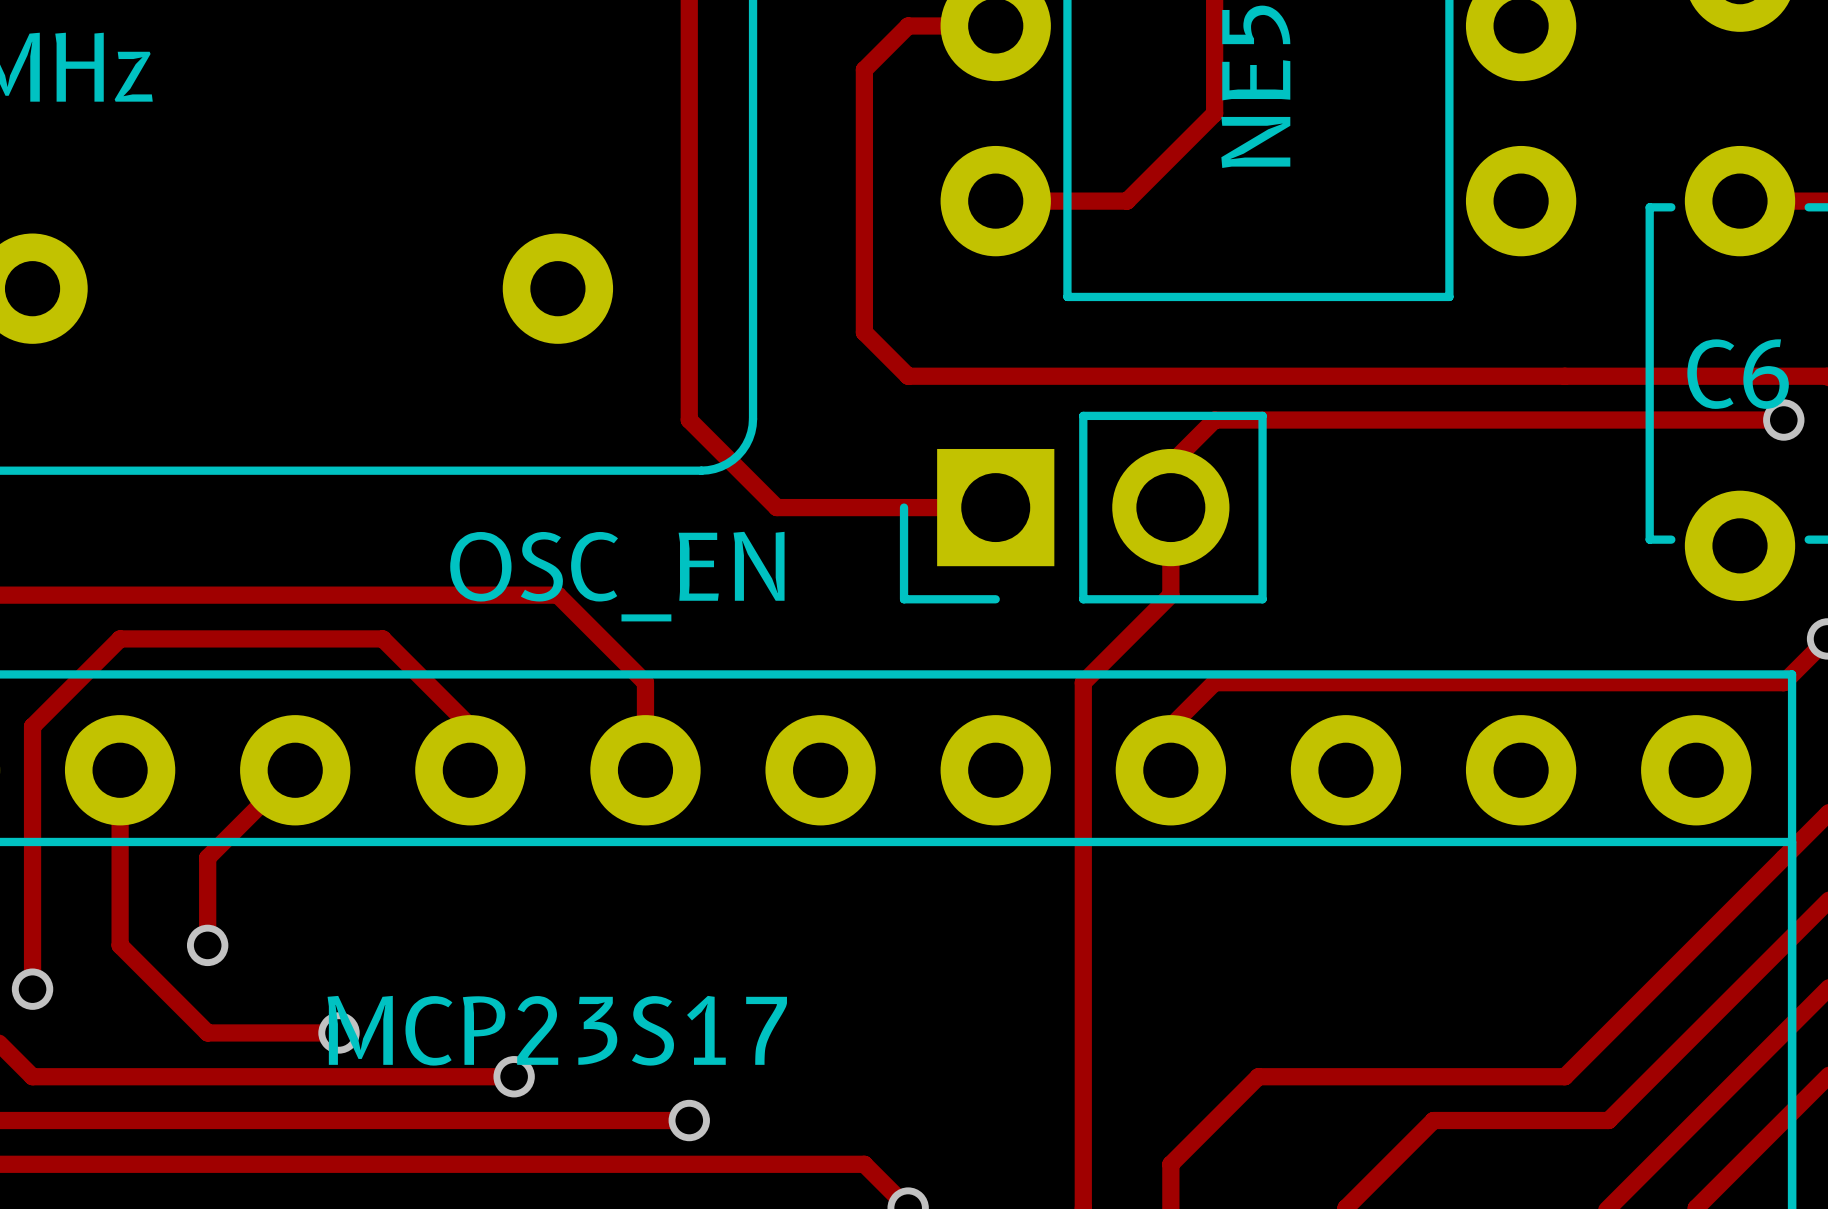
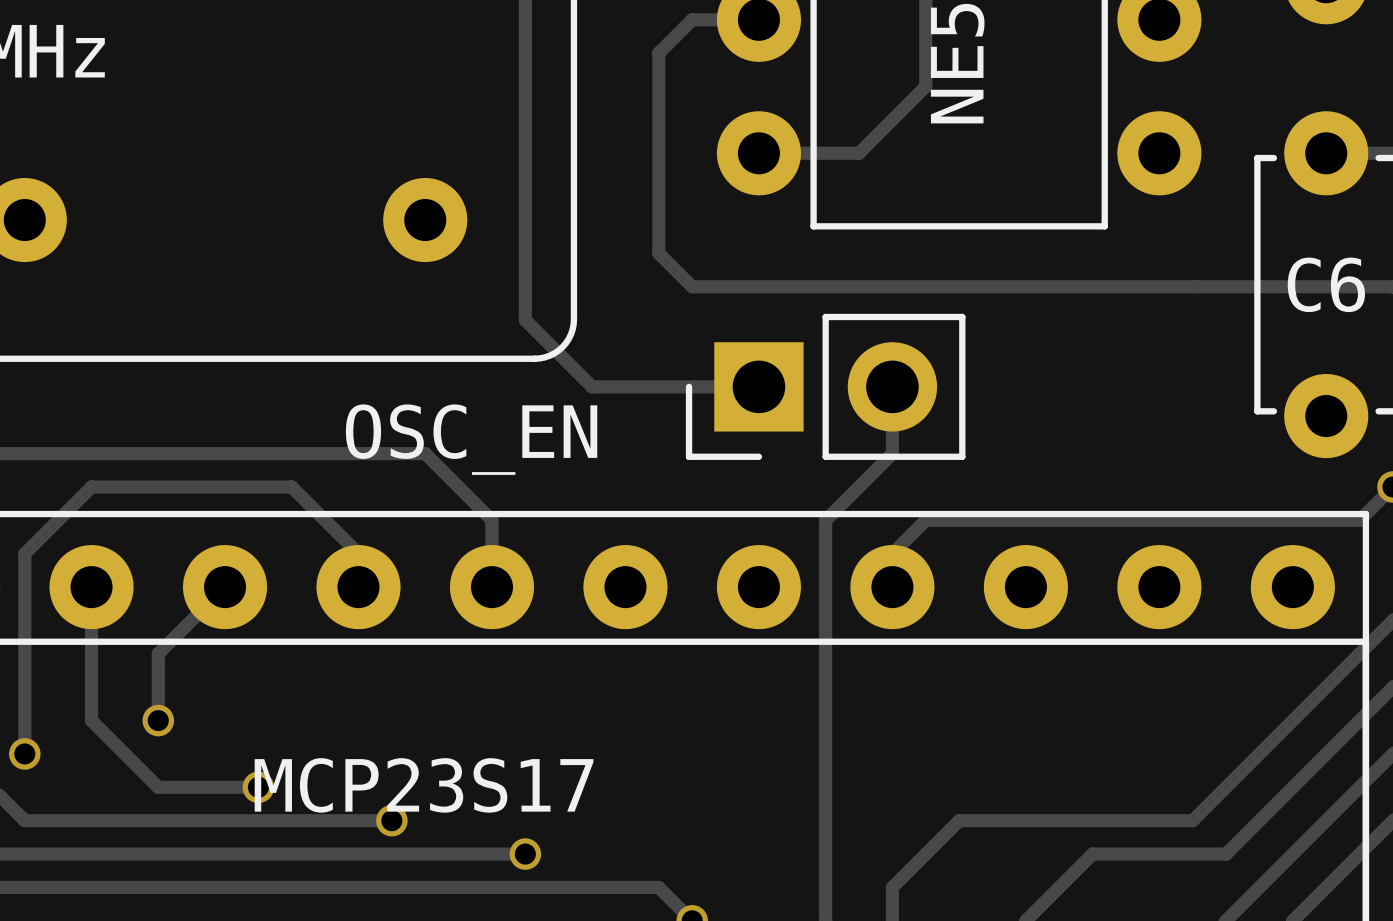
track: (1783, 420) (1214, 420) (1170, 463) (1170, 507) -> none
via: (1783, 420) -> none

